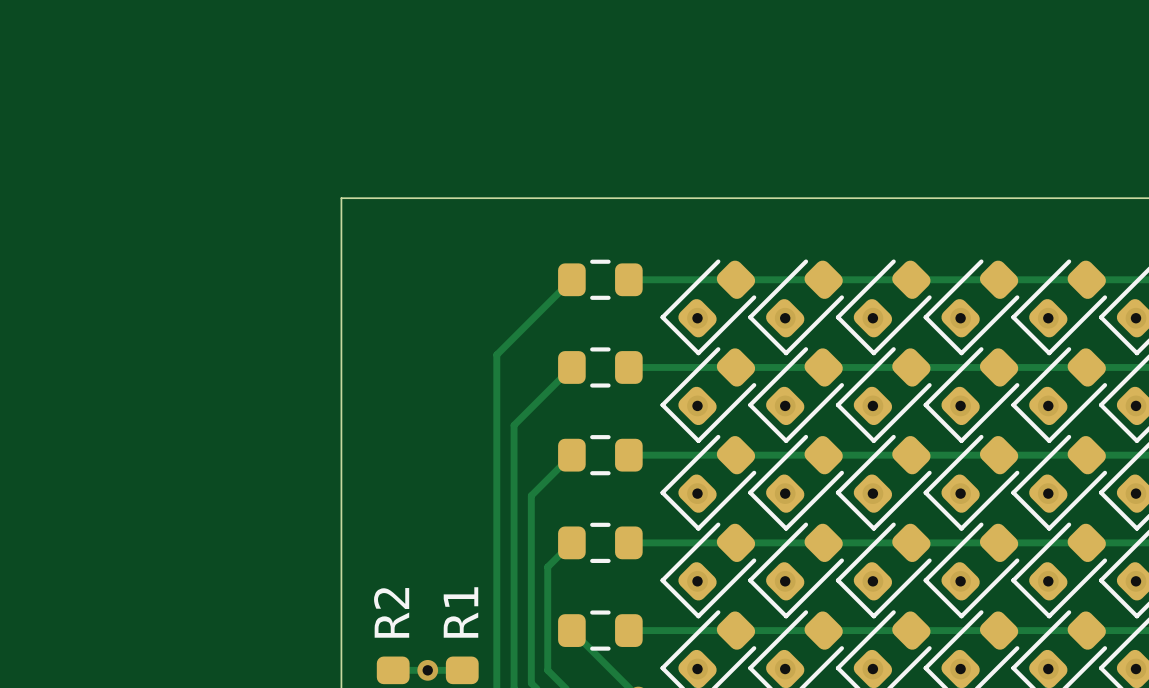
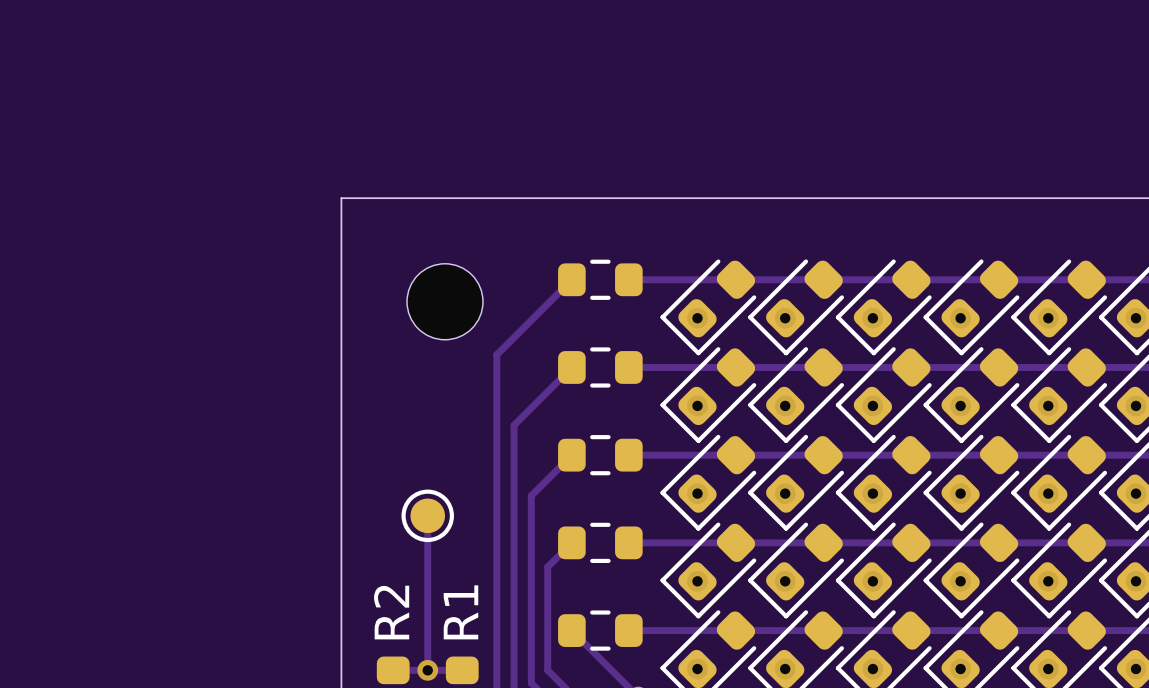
part: none -> (445, 301)
track: none -> (427, 515) (427, 670)
part: none -> (427, 515)

